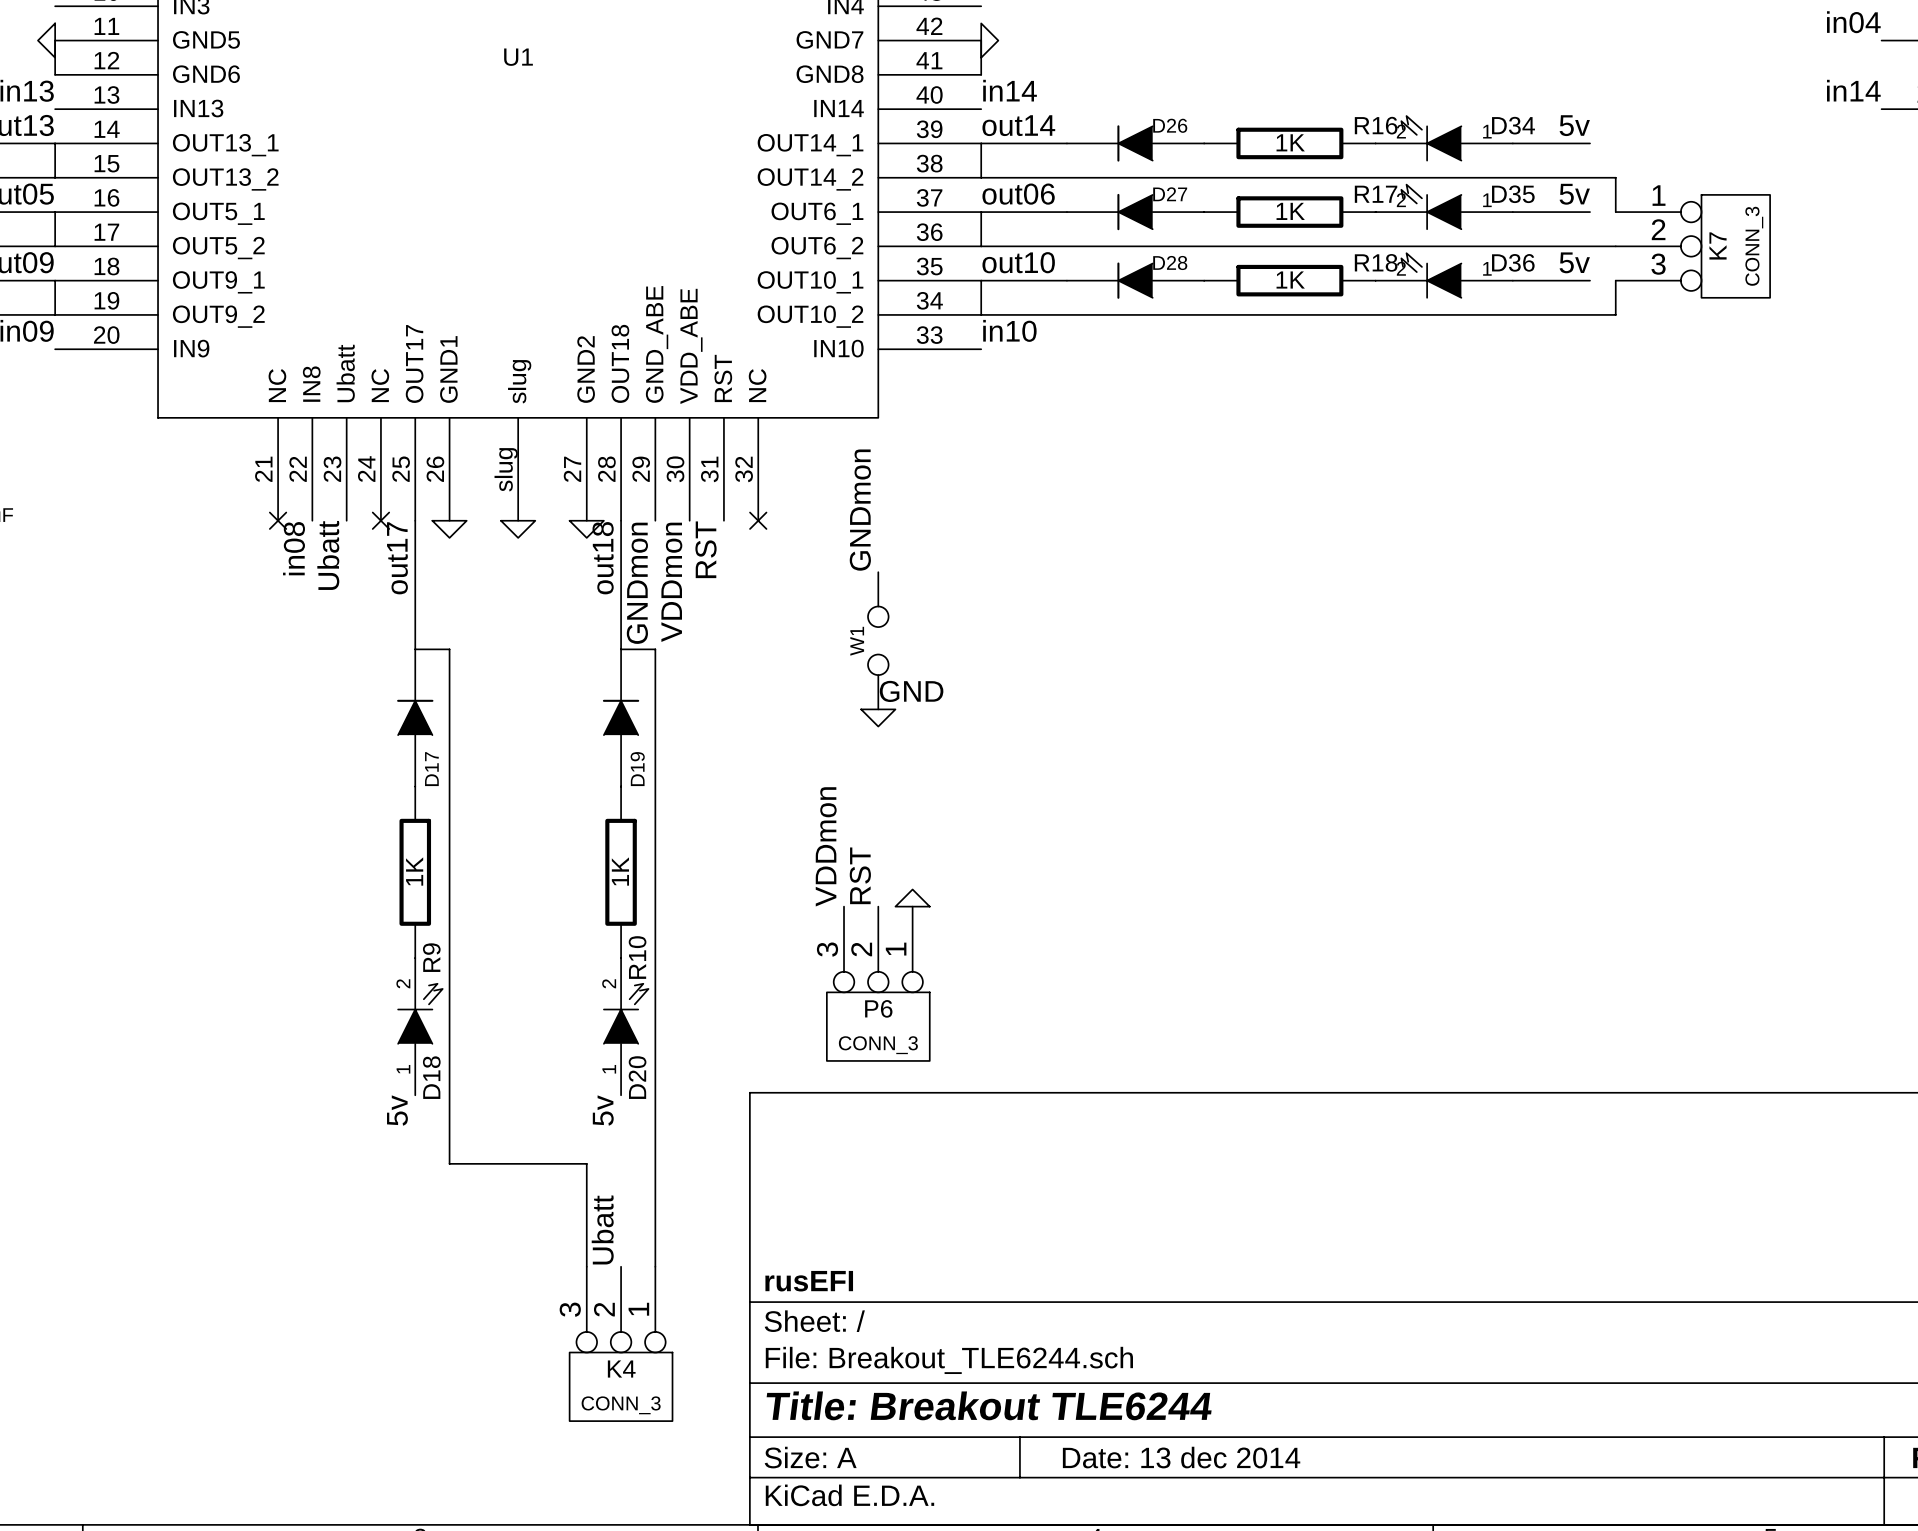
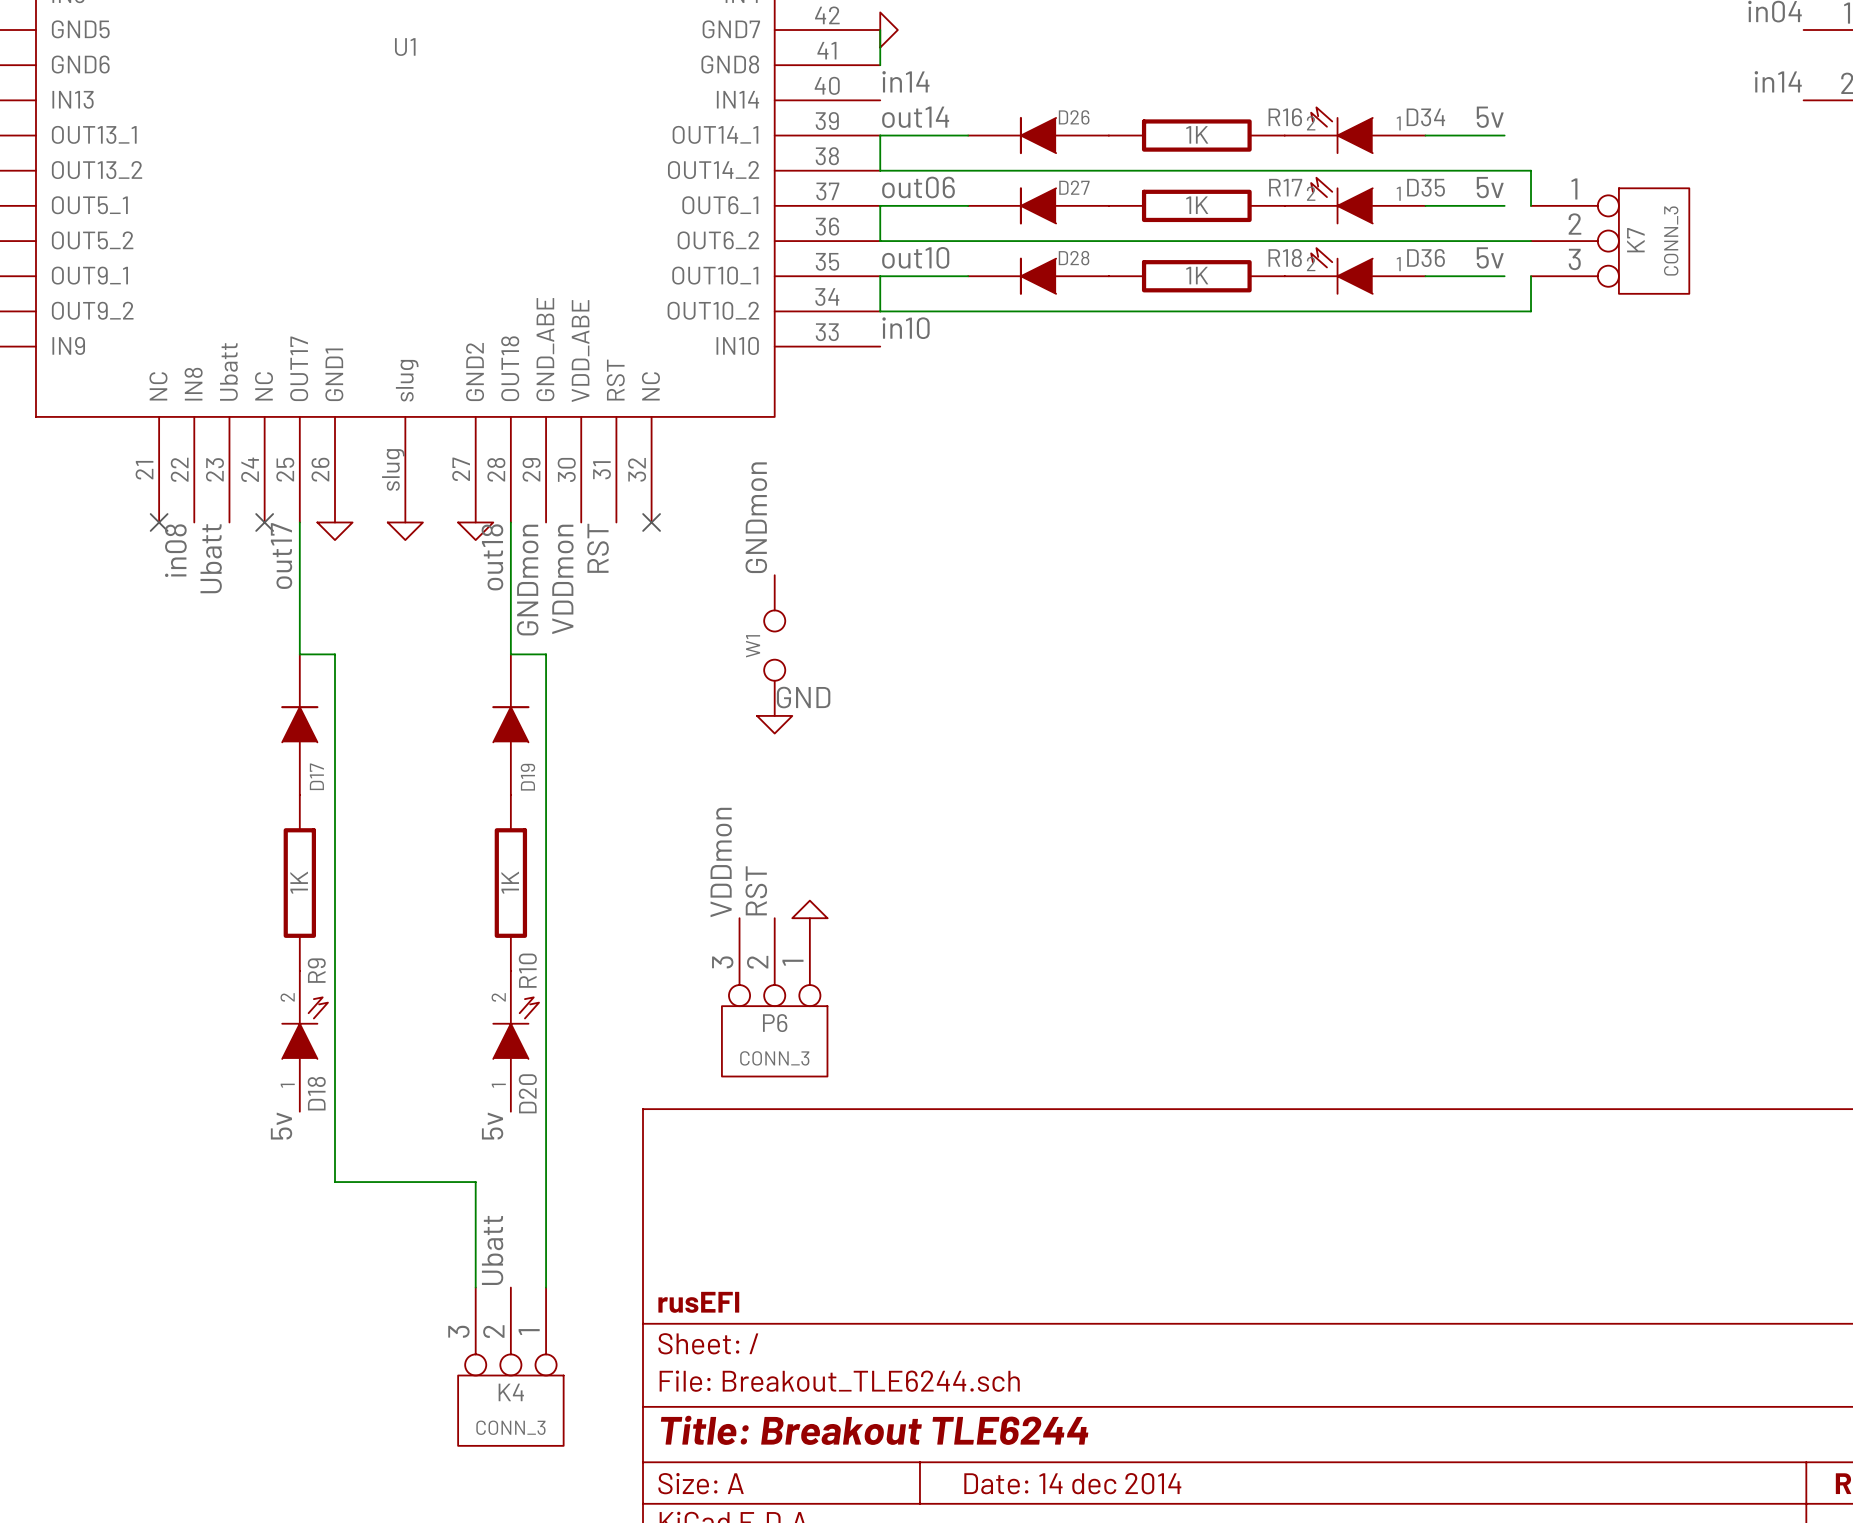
title block: Date: 13 dec 2014 (1181, 1457) -> Date: 14 dec 2014 (1072, 1483)

